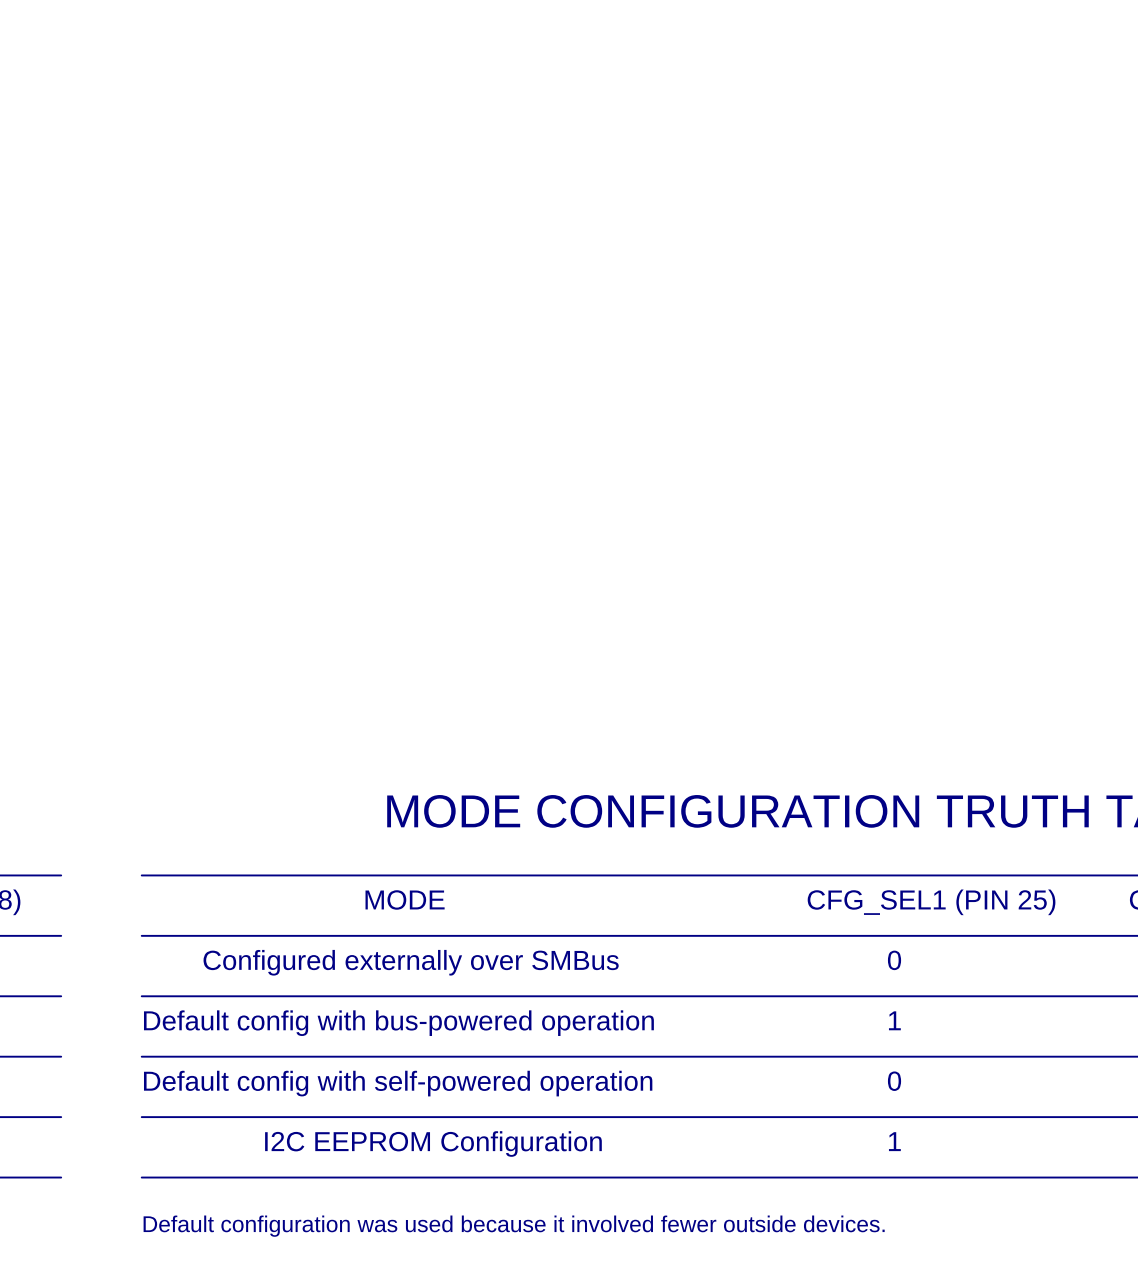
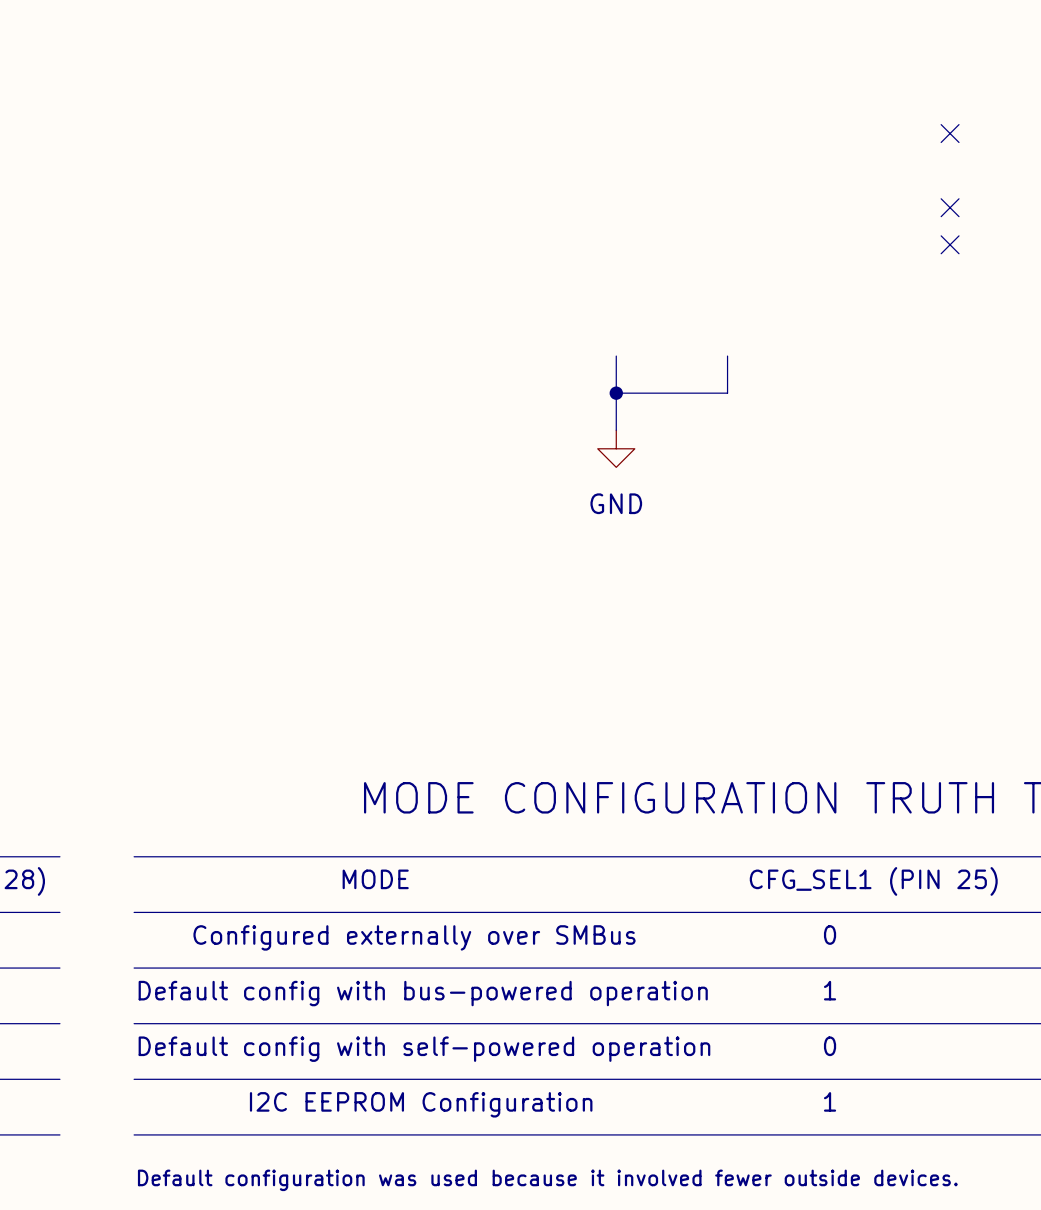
no-connect mark: none -> (950, 133)
no-connect mark: none -> (950, 207)
no-connect mark: none -> (950, 244)
wire: none -> (616, 356) (616, 430)
wire: none -> (727, 356) (727, 393) (616, 393)
junction: none -> (616, 393)
power symbol: none -> GND (616, 448)

